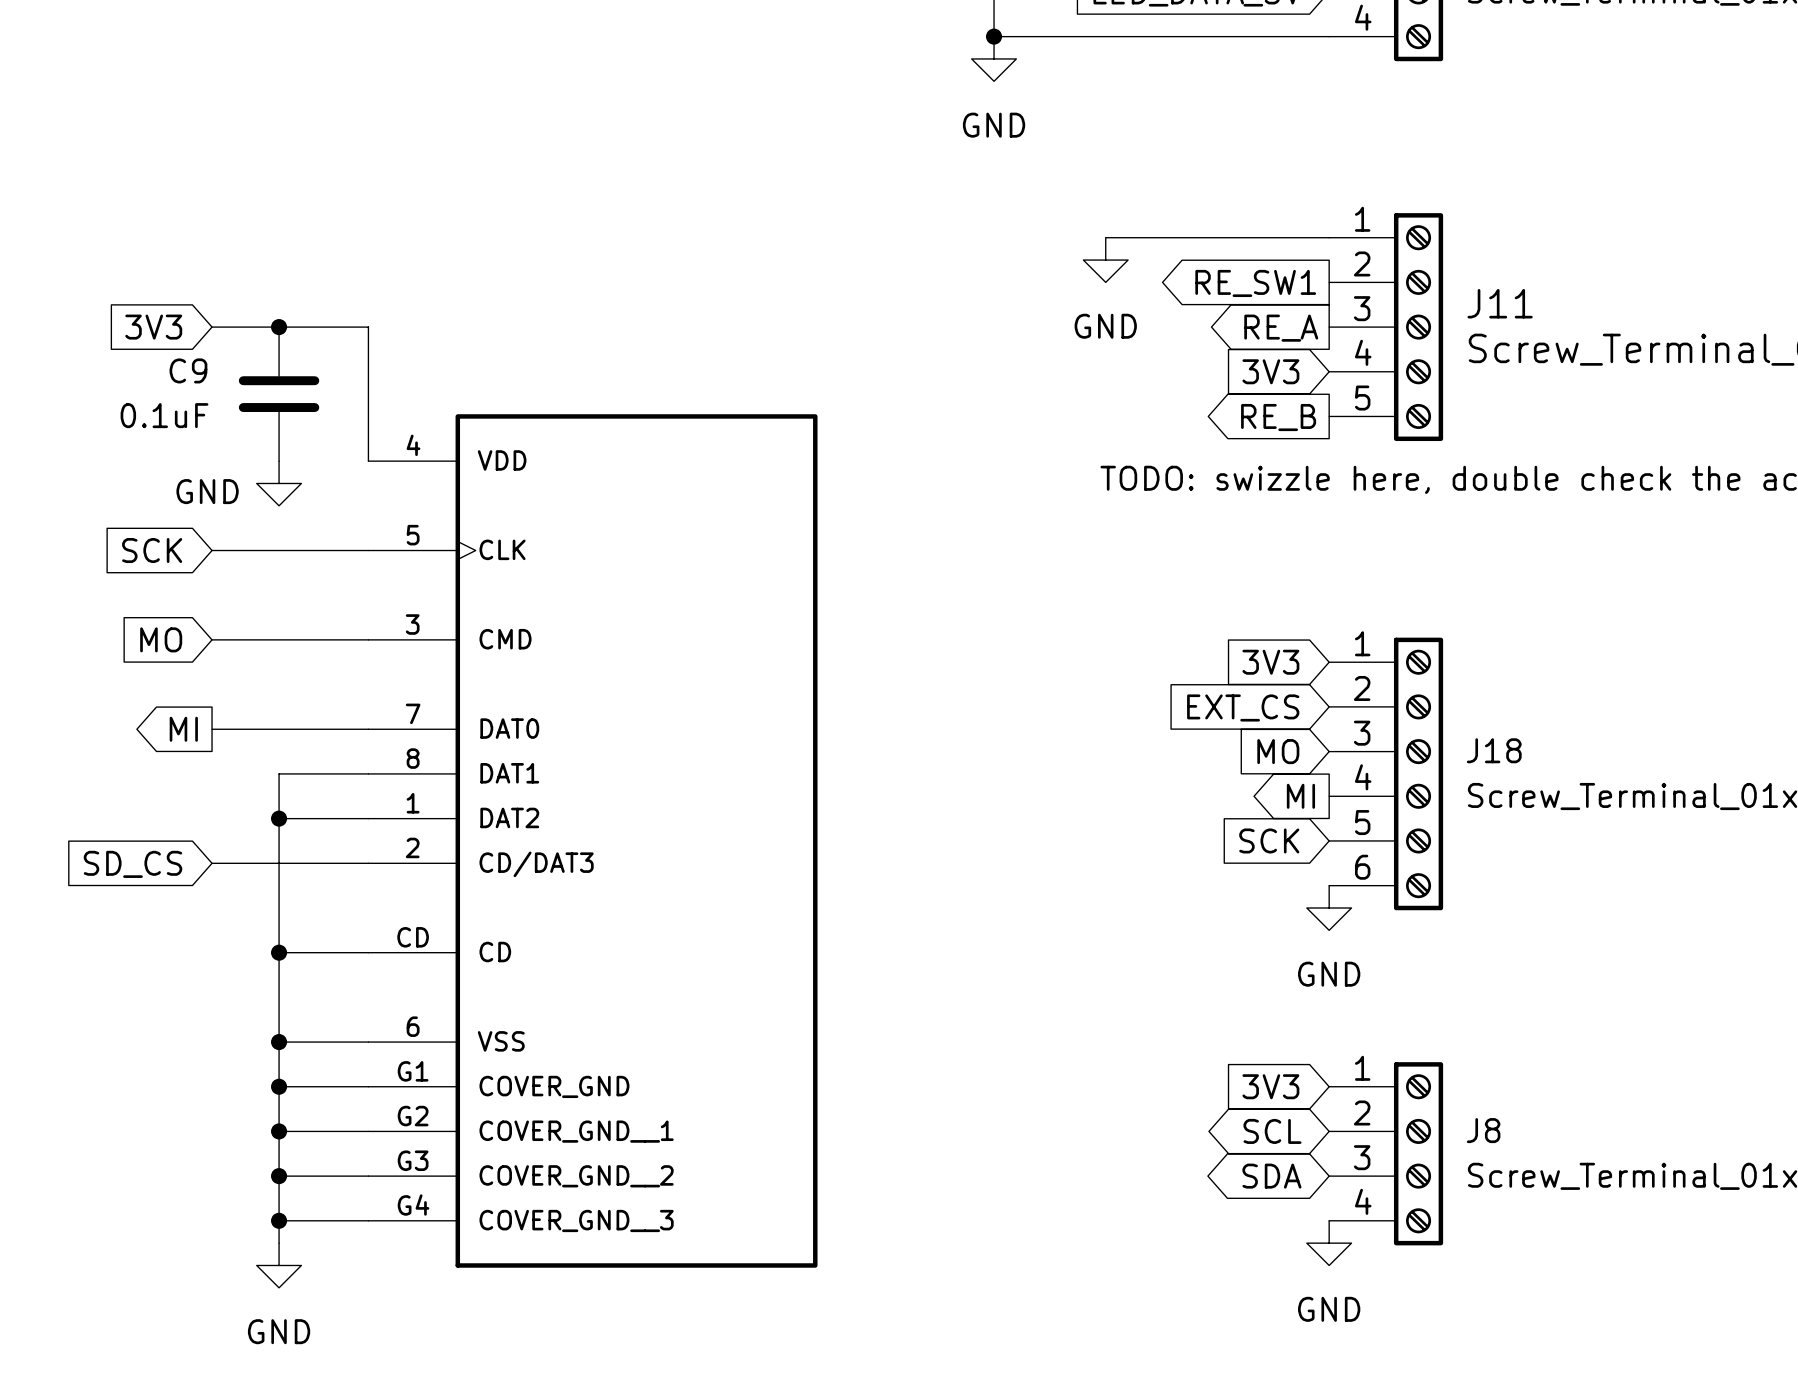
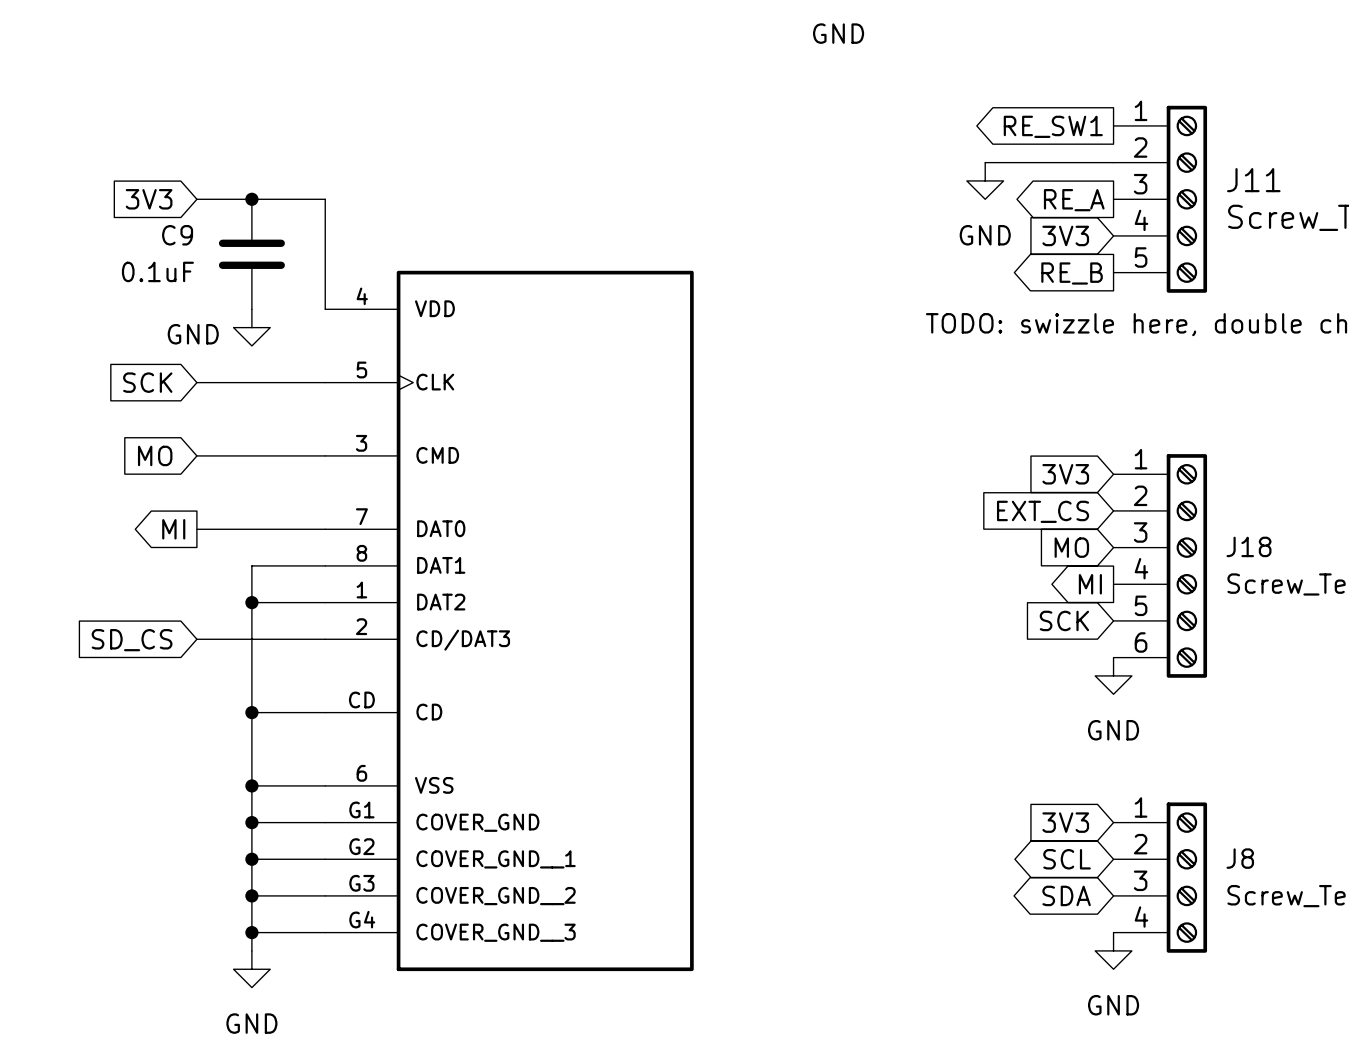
wire: (1105, 237) (1329, 237) -> none
power symbol position: GND (1105, 260) -> GND (985, 180)
wire: none -> (985, 162) (1113, 162)
global label position: RE_SW1 (1255, 283) -> RE_SW1 (1053, 126)

